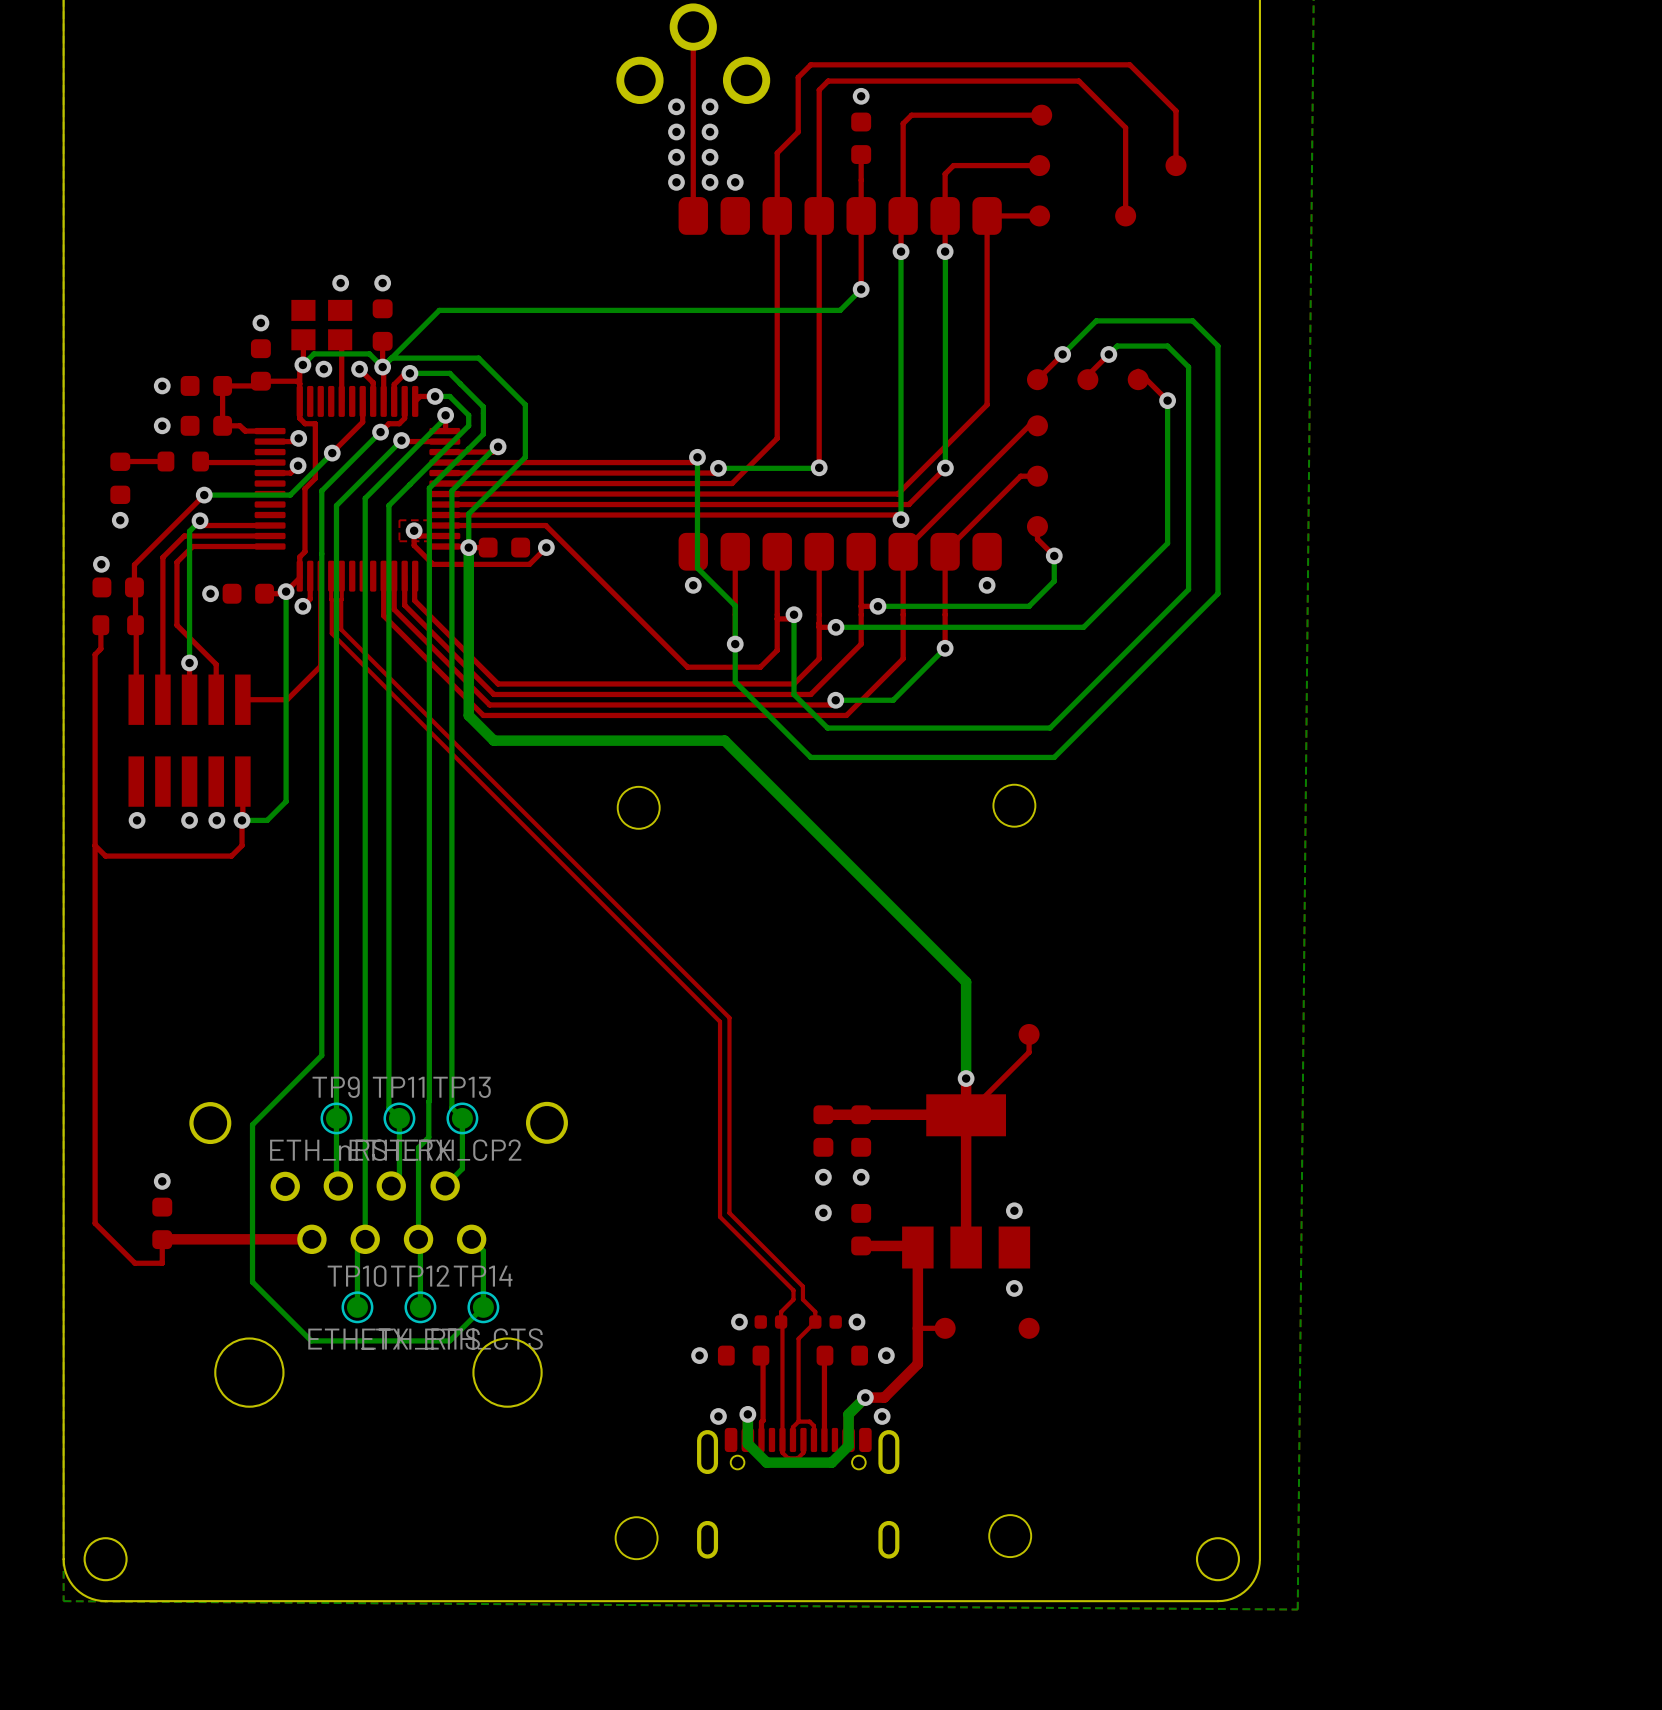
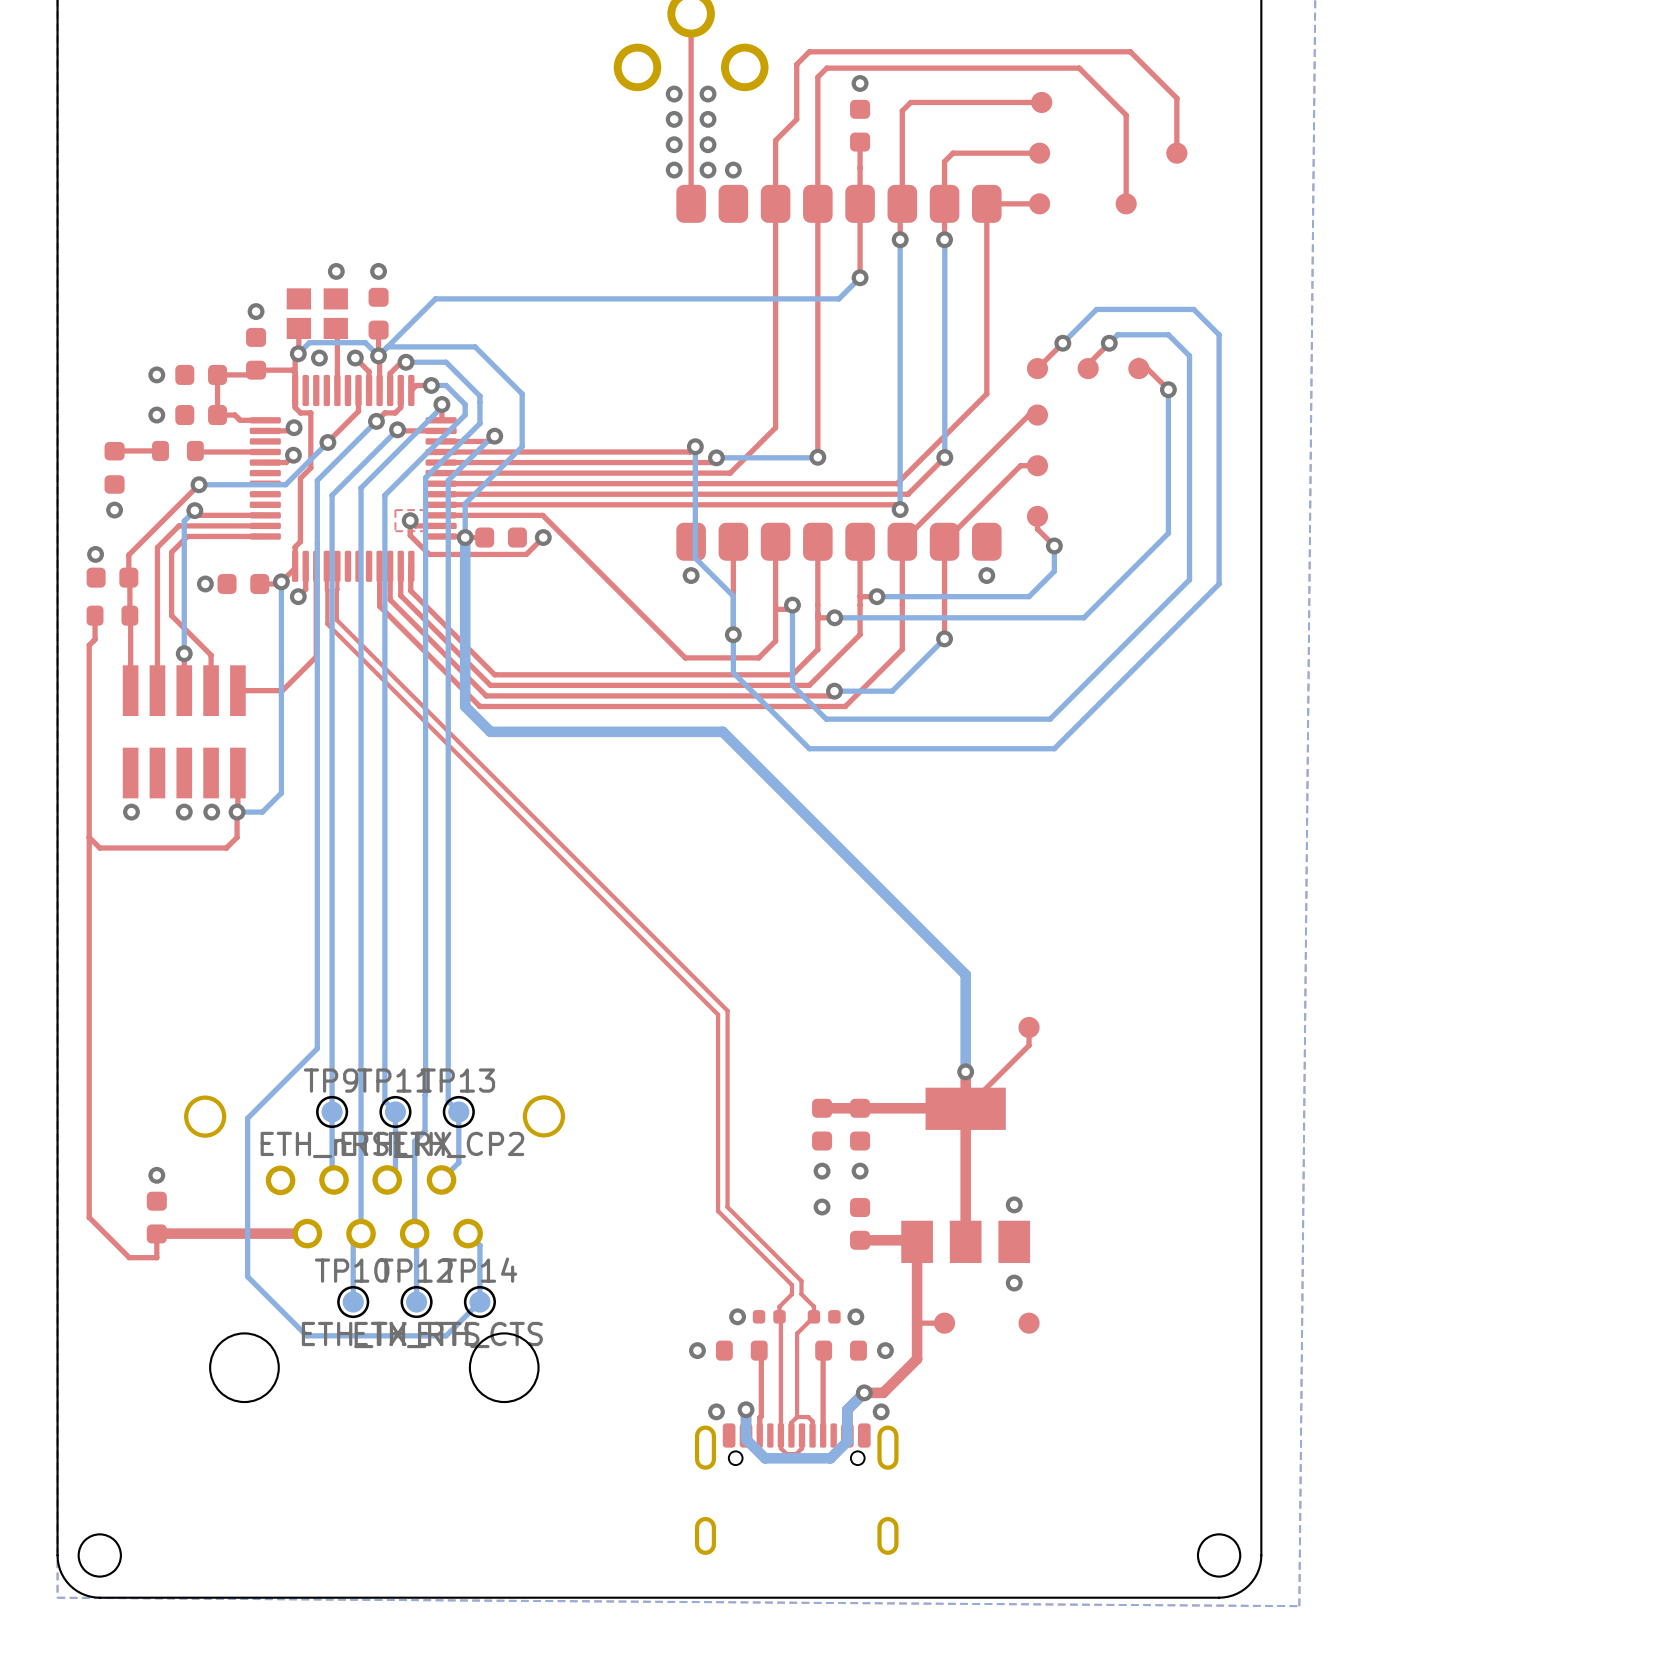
drawing: [615, 784, 1036, 1560] -> none

